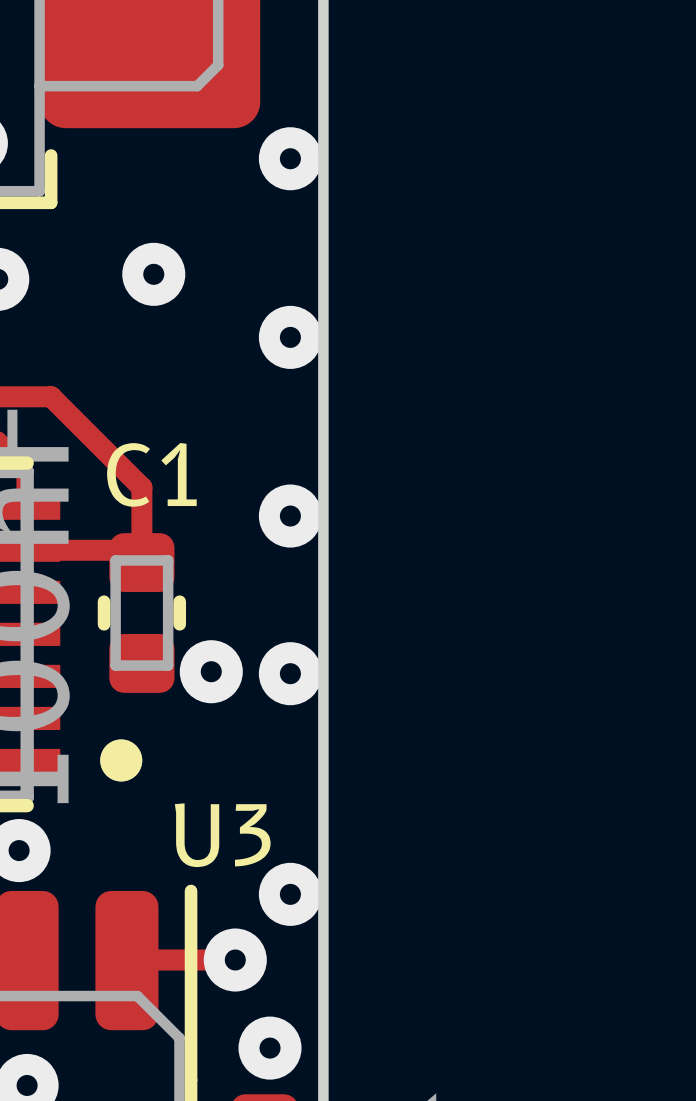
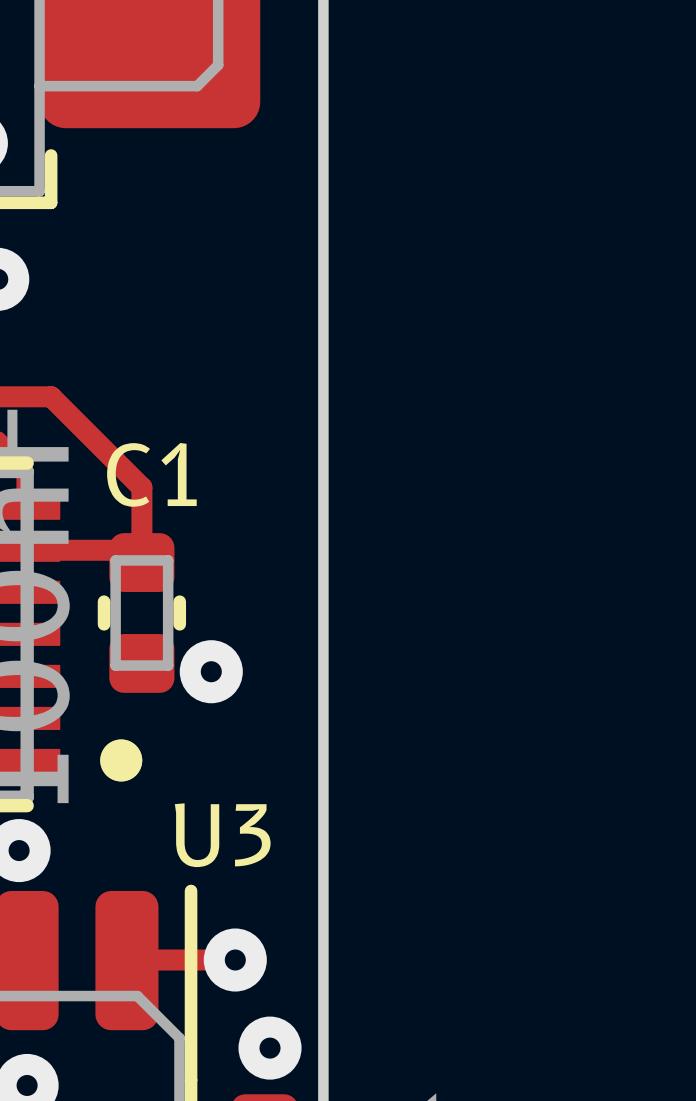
via: (290, 158) -> none
via: (153, 274) -> none
via: (290, 337) -> none
via: (290, 516) -> none
via: (290, 673) -> none
via: (290, 894) -> none

